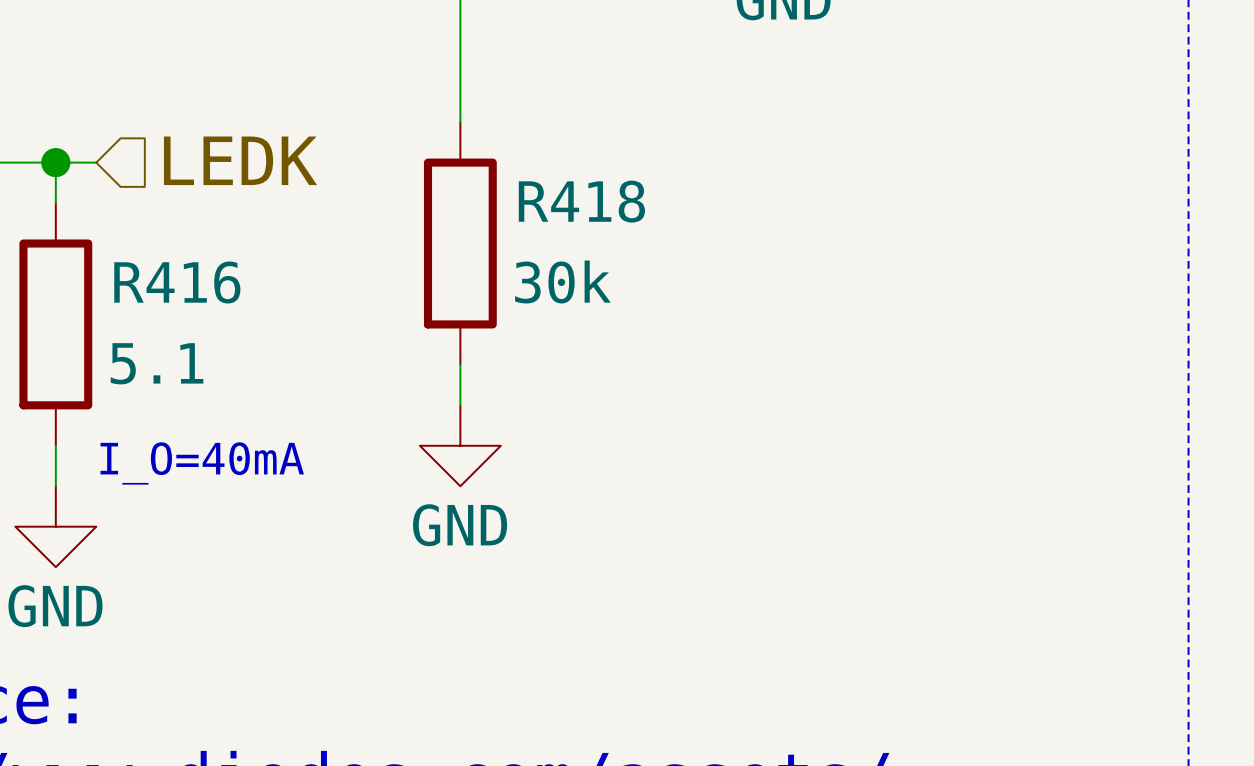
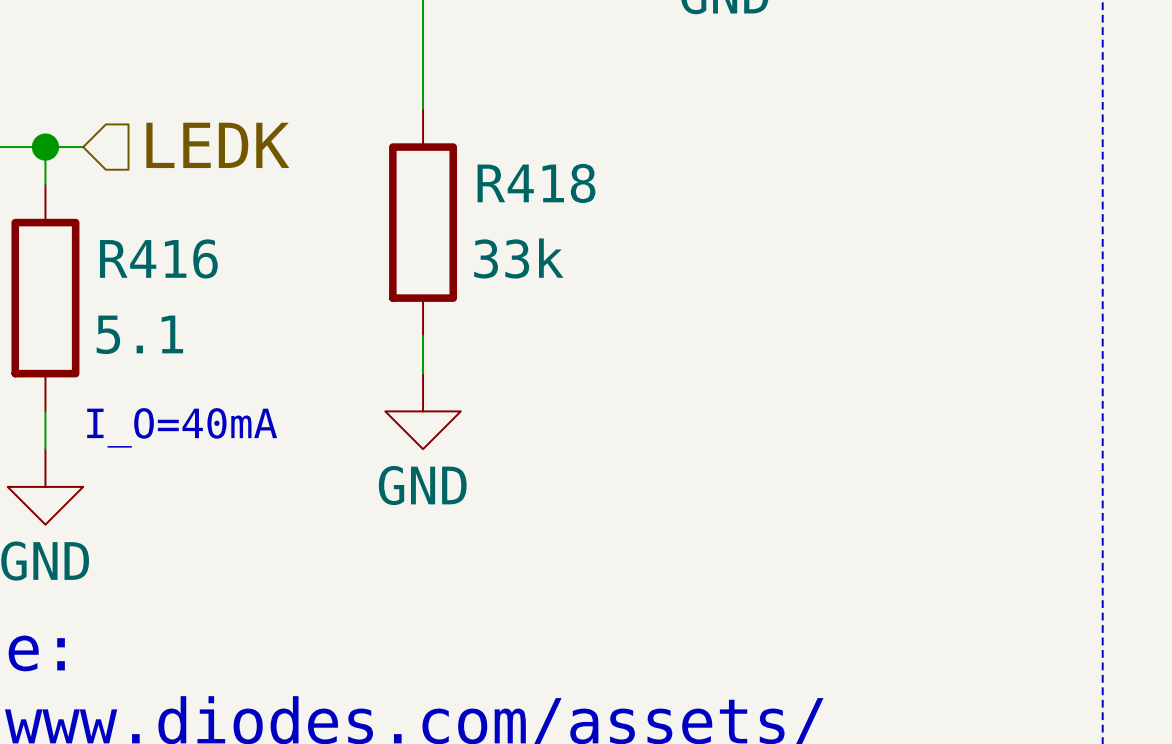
R418 value: 30k (562, 282) -> 33k (518, 258)

